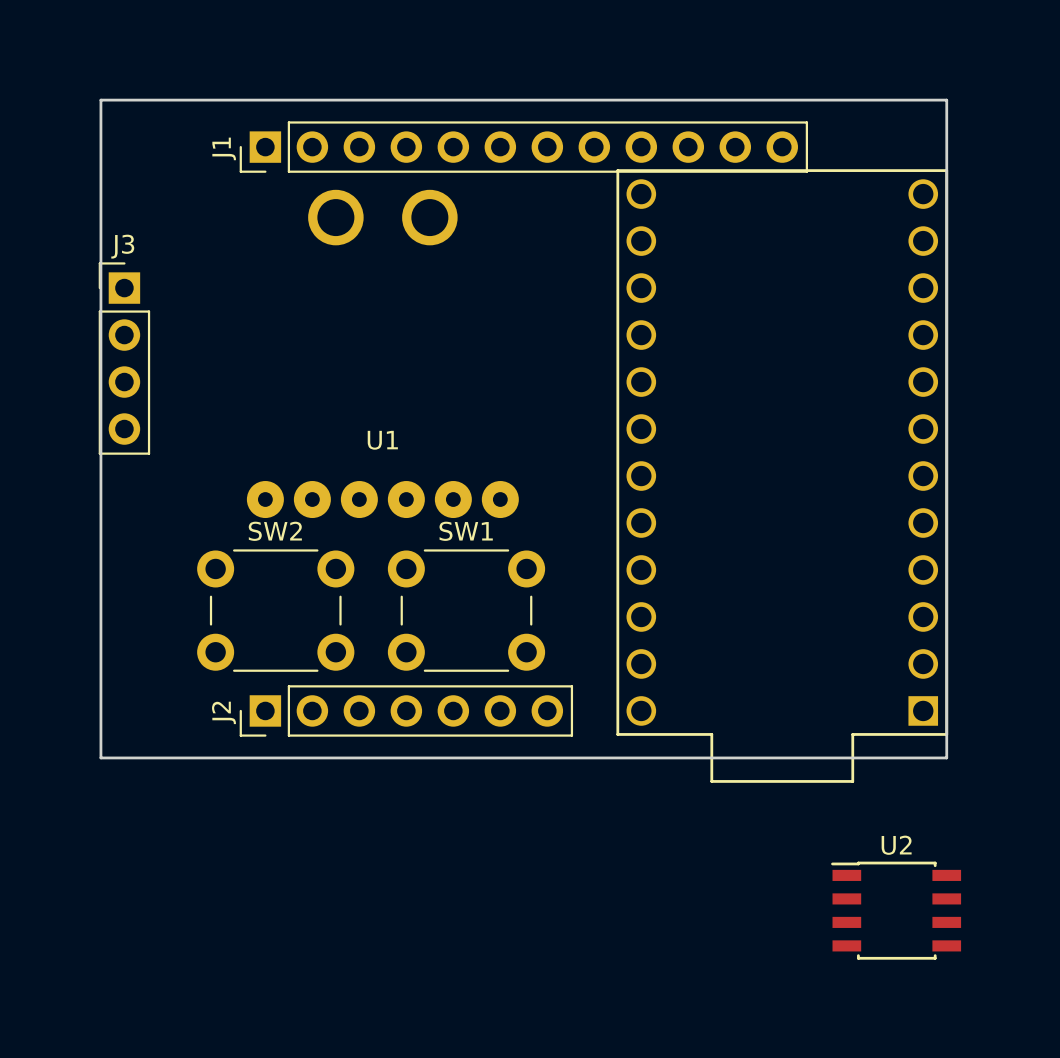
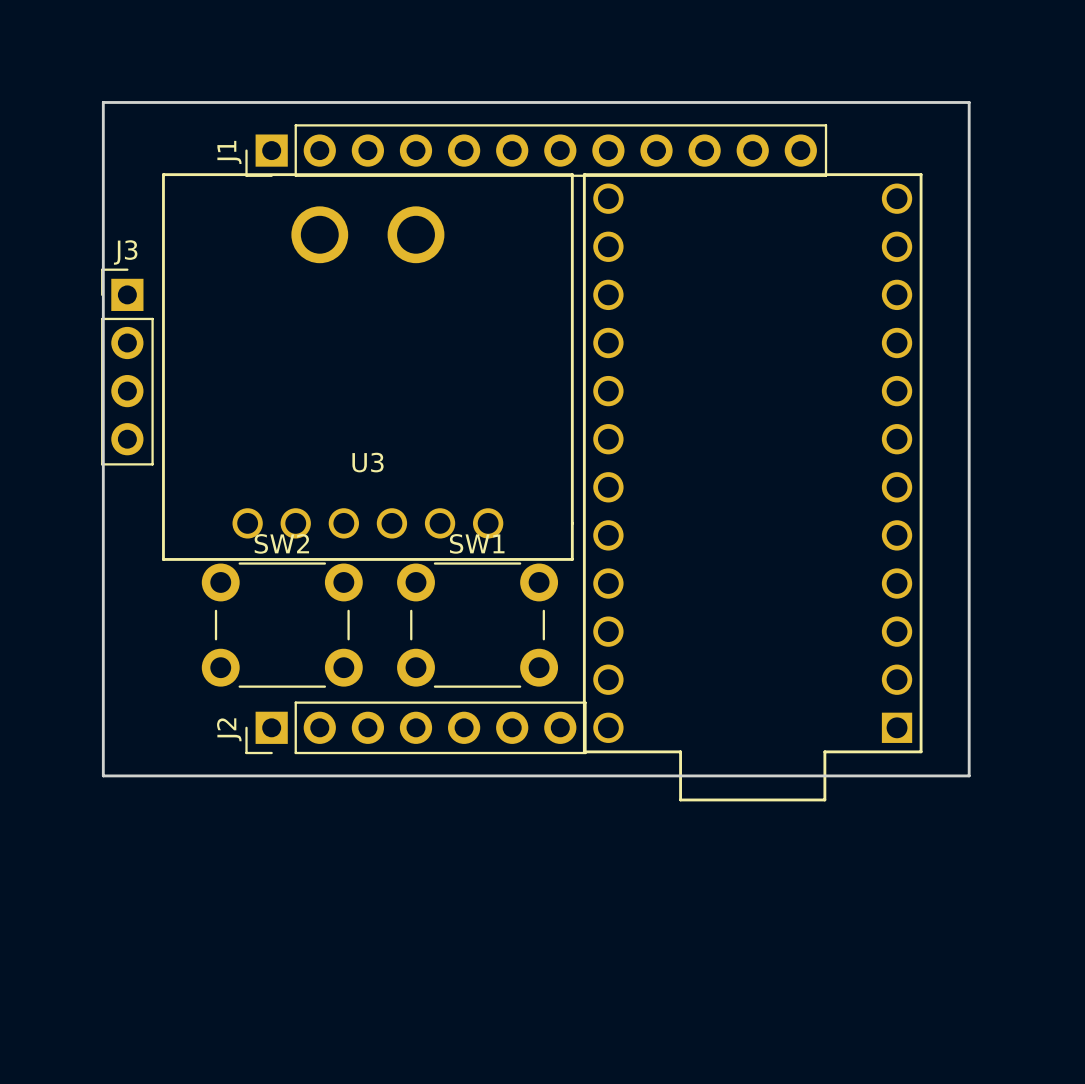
U1: (382, 353) -> none
U3: none -> (367, 367)
part position: (782, 476) -> (752, 487)
U2: (896, 910) -> none

